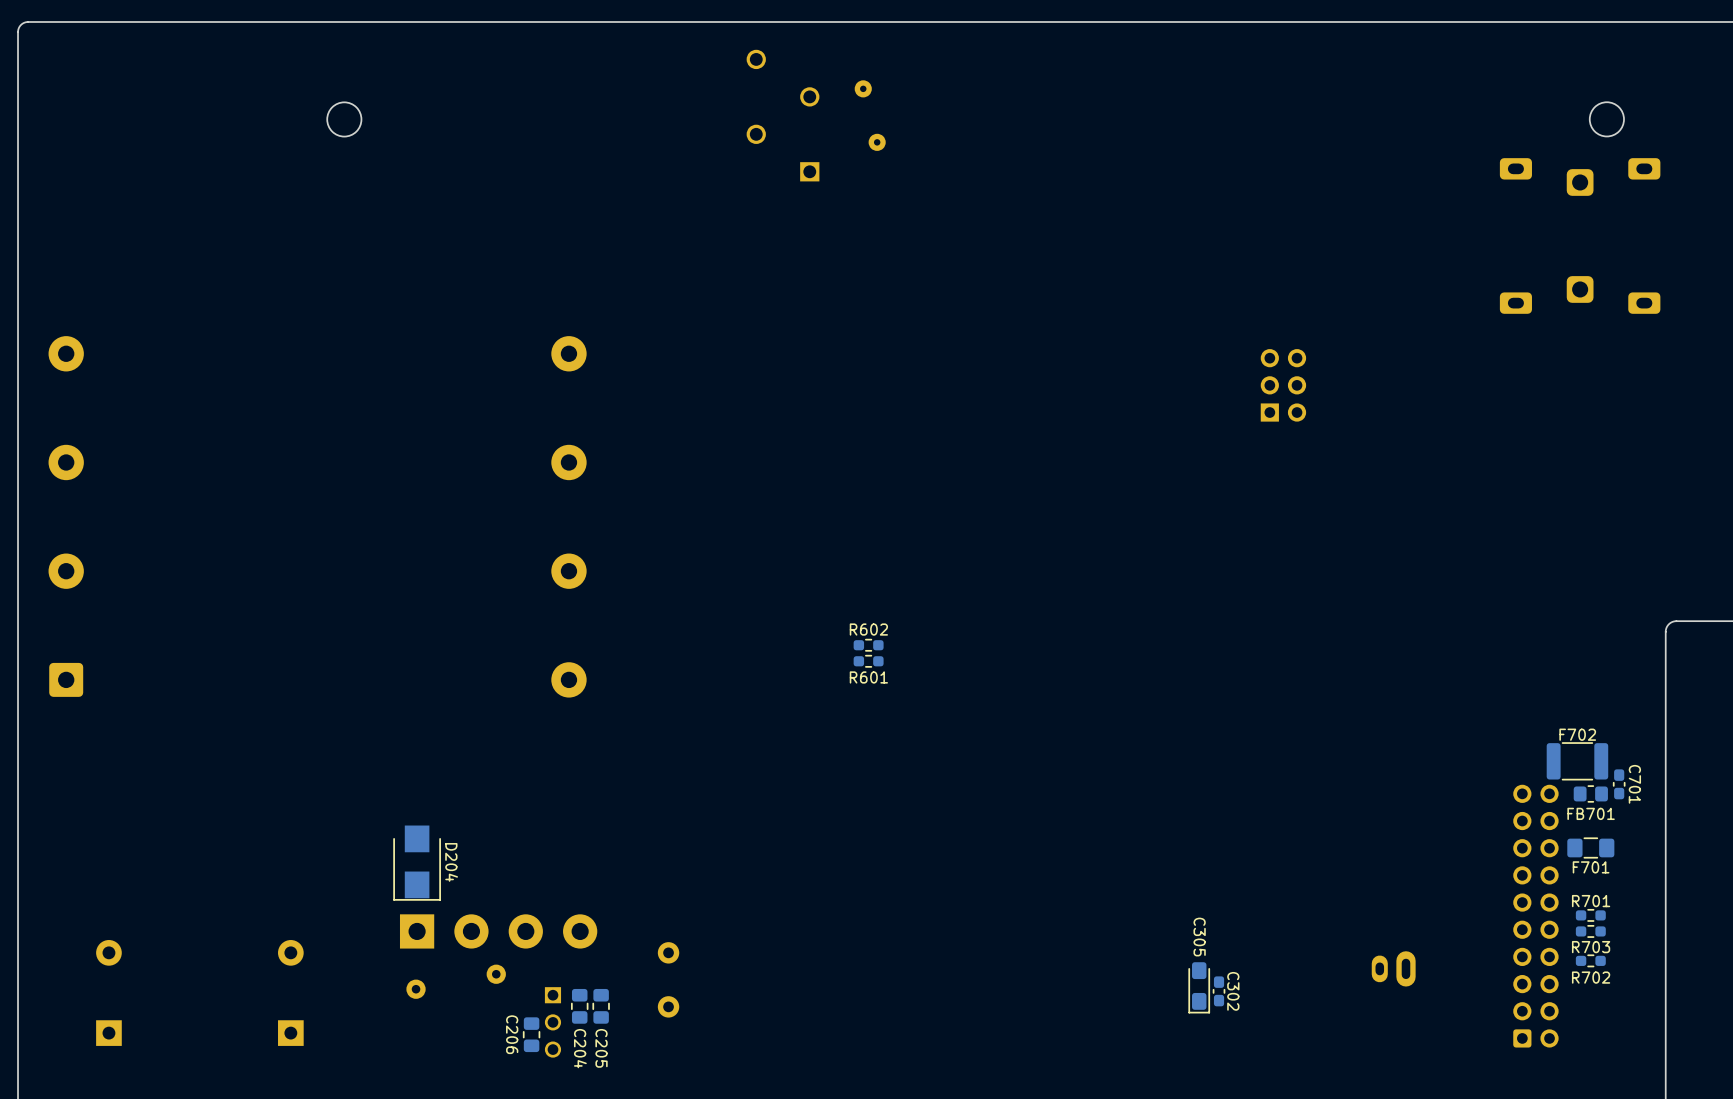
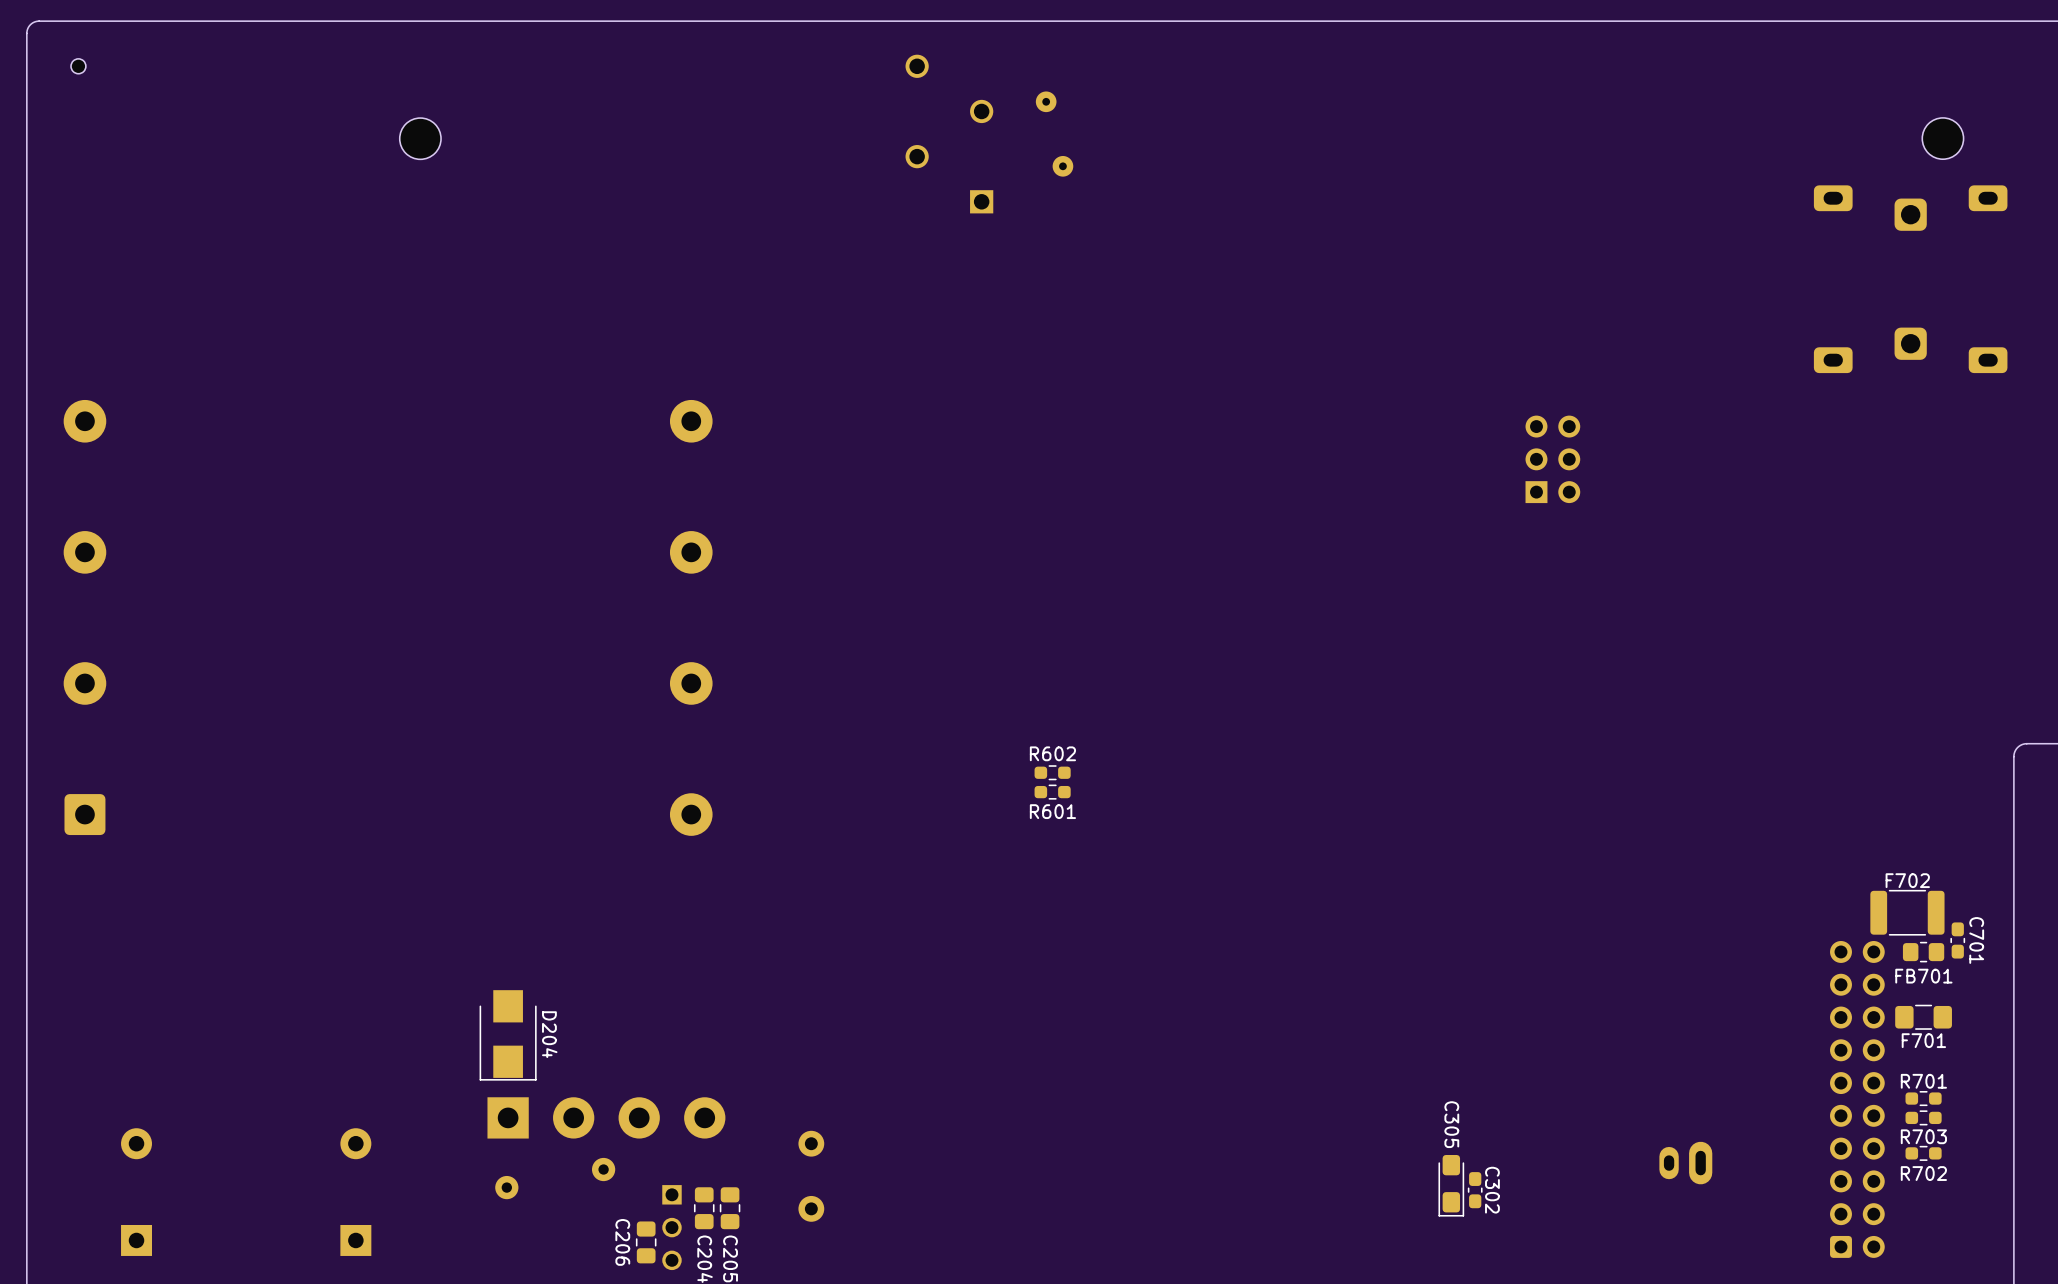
part: none -> (78, 66)

